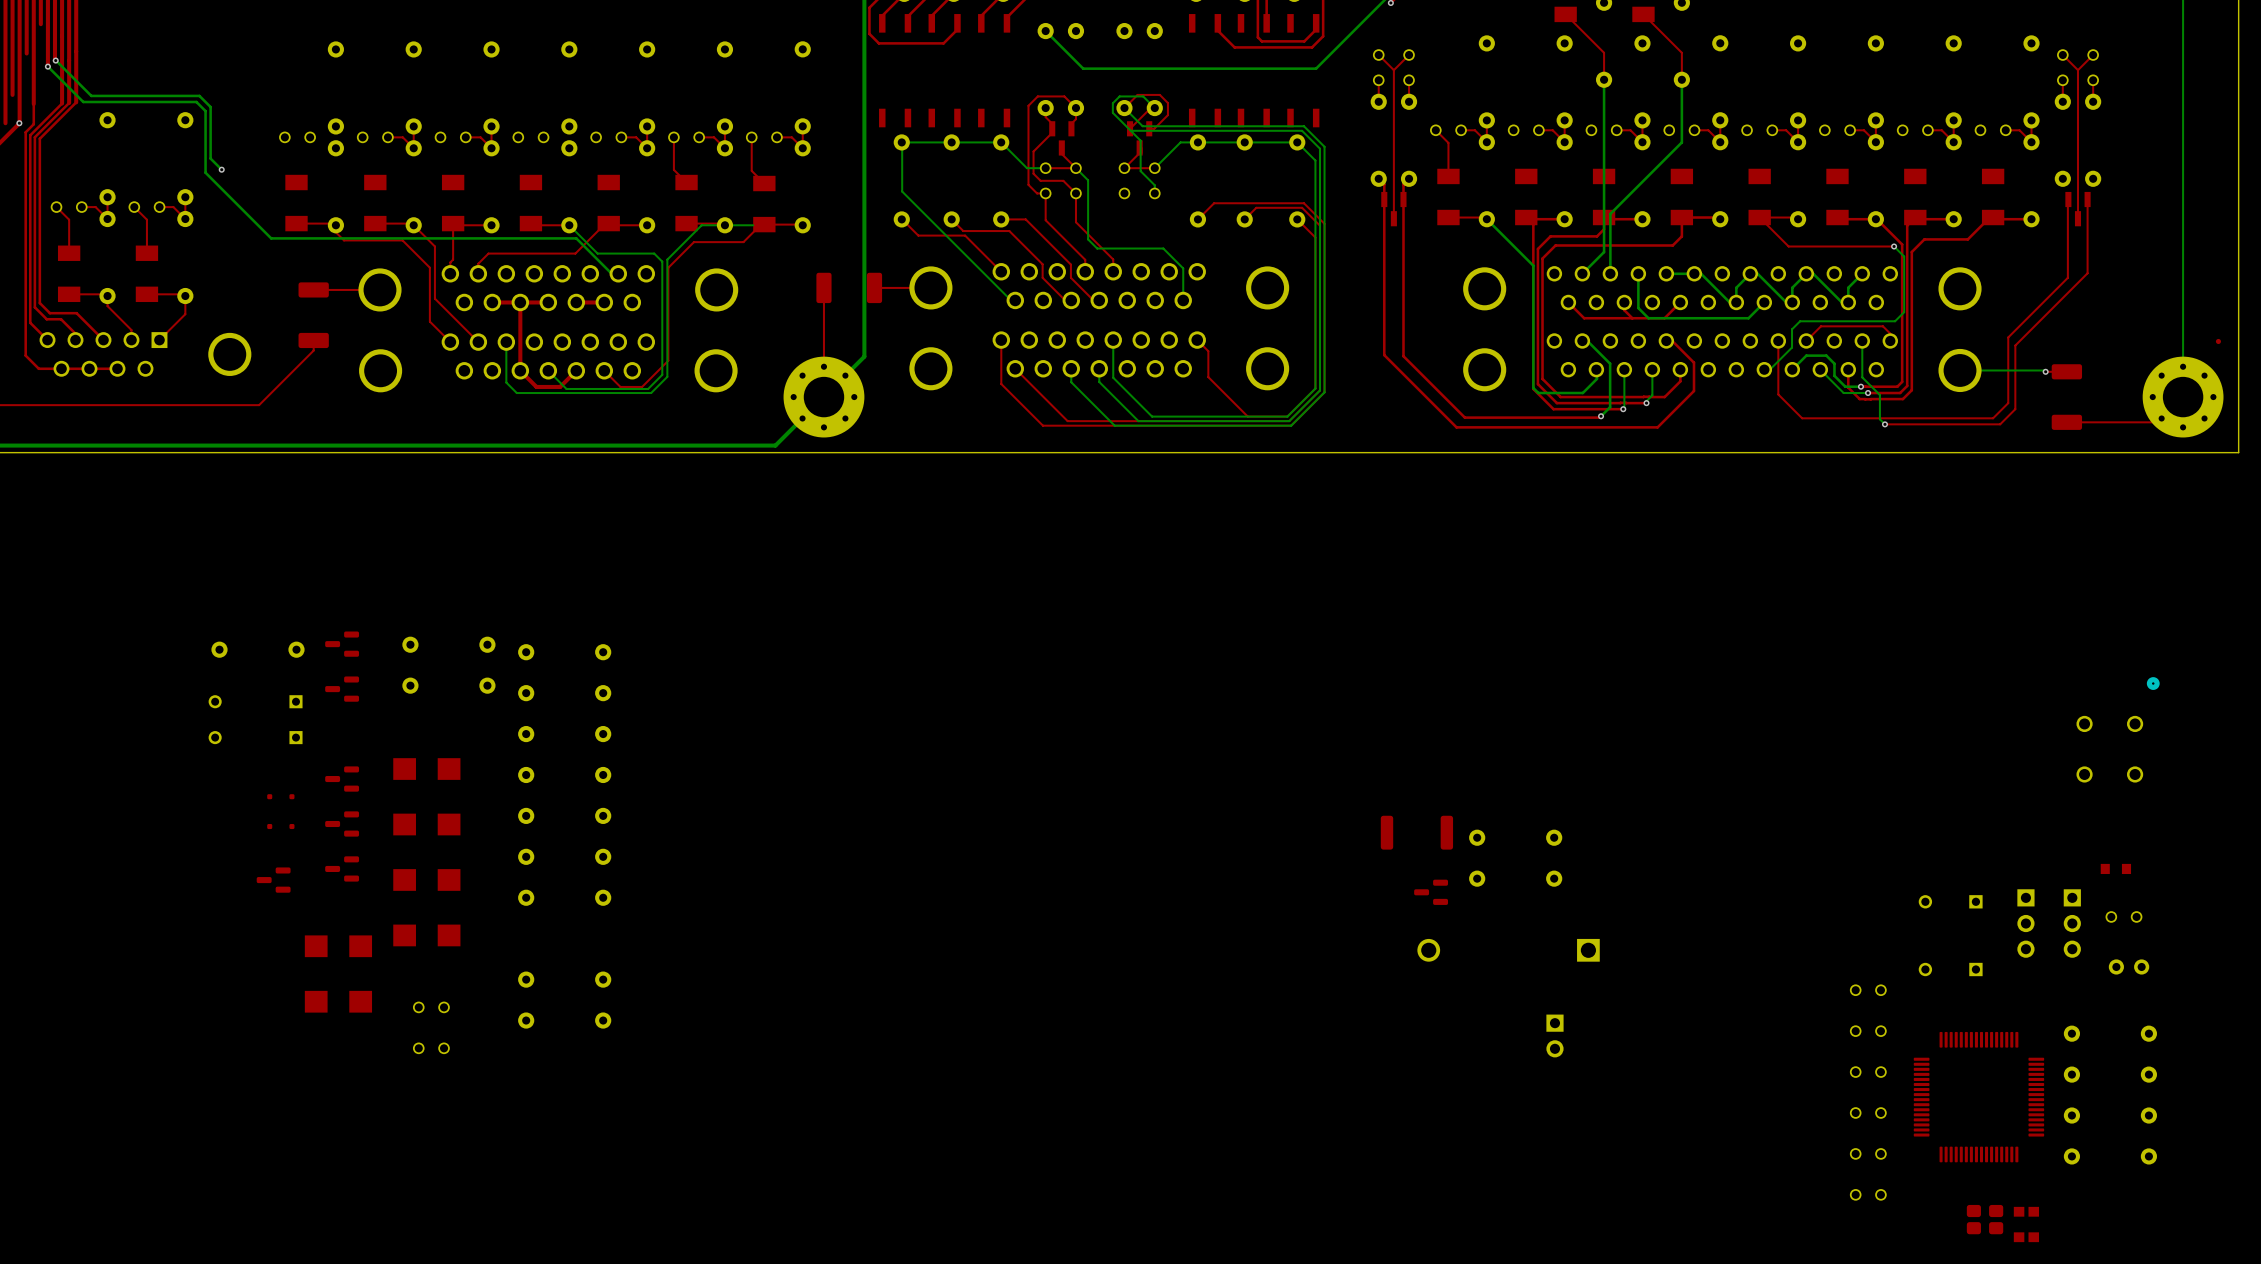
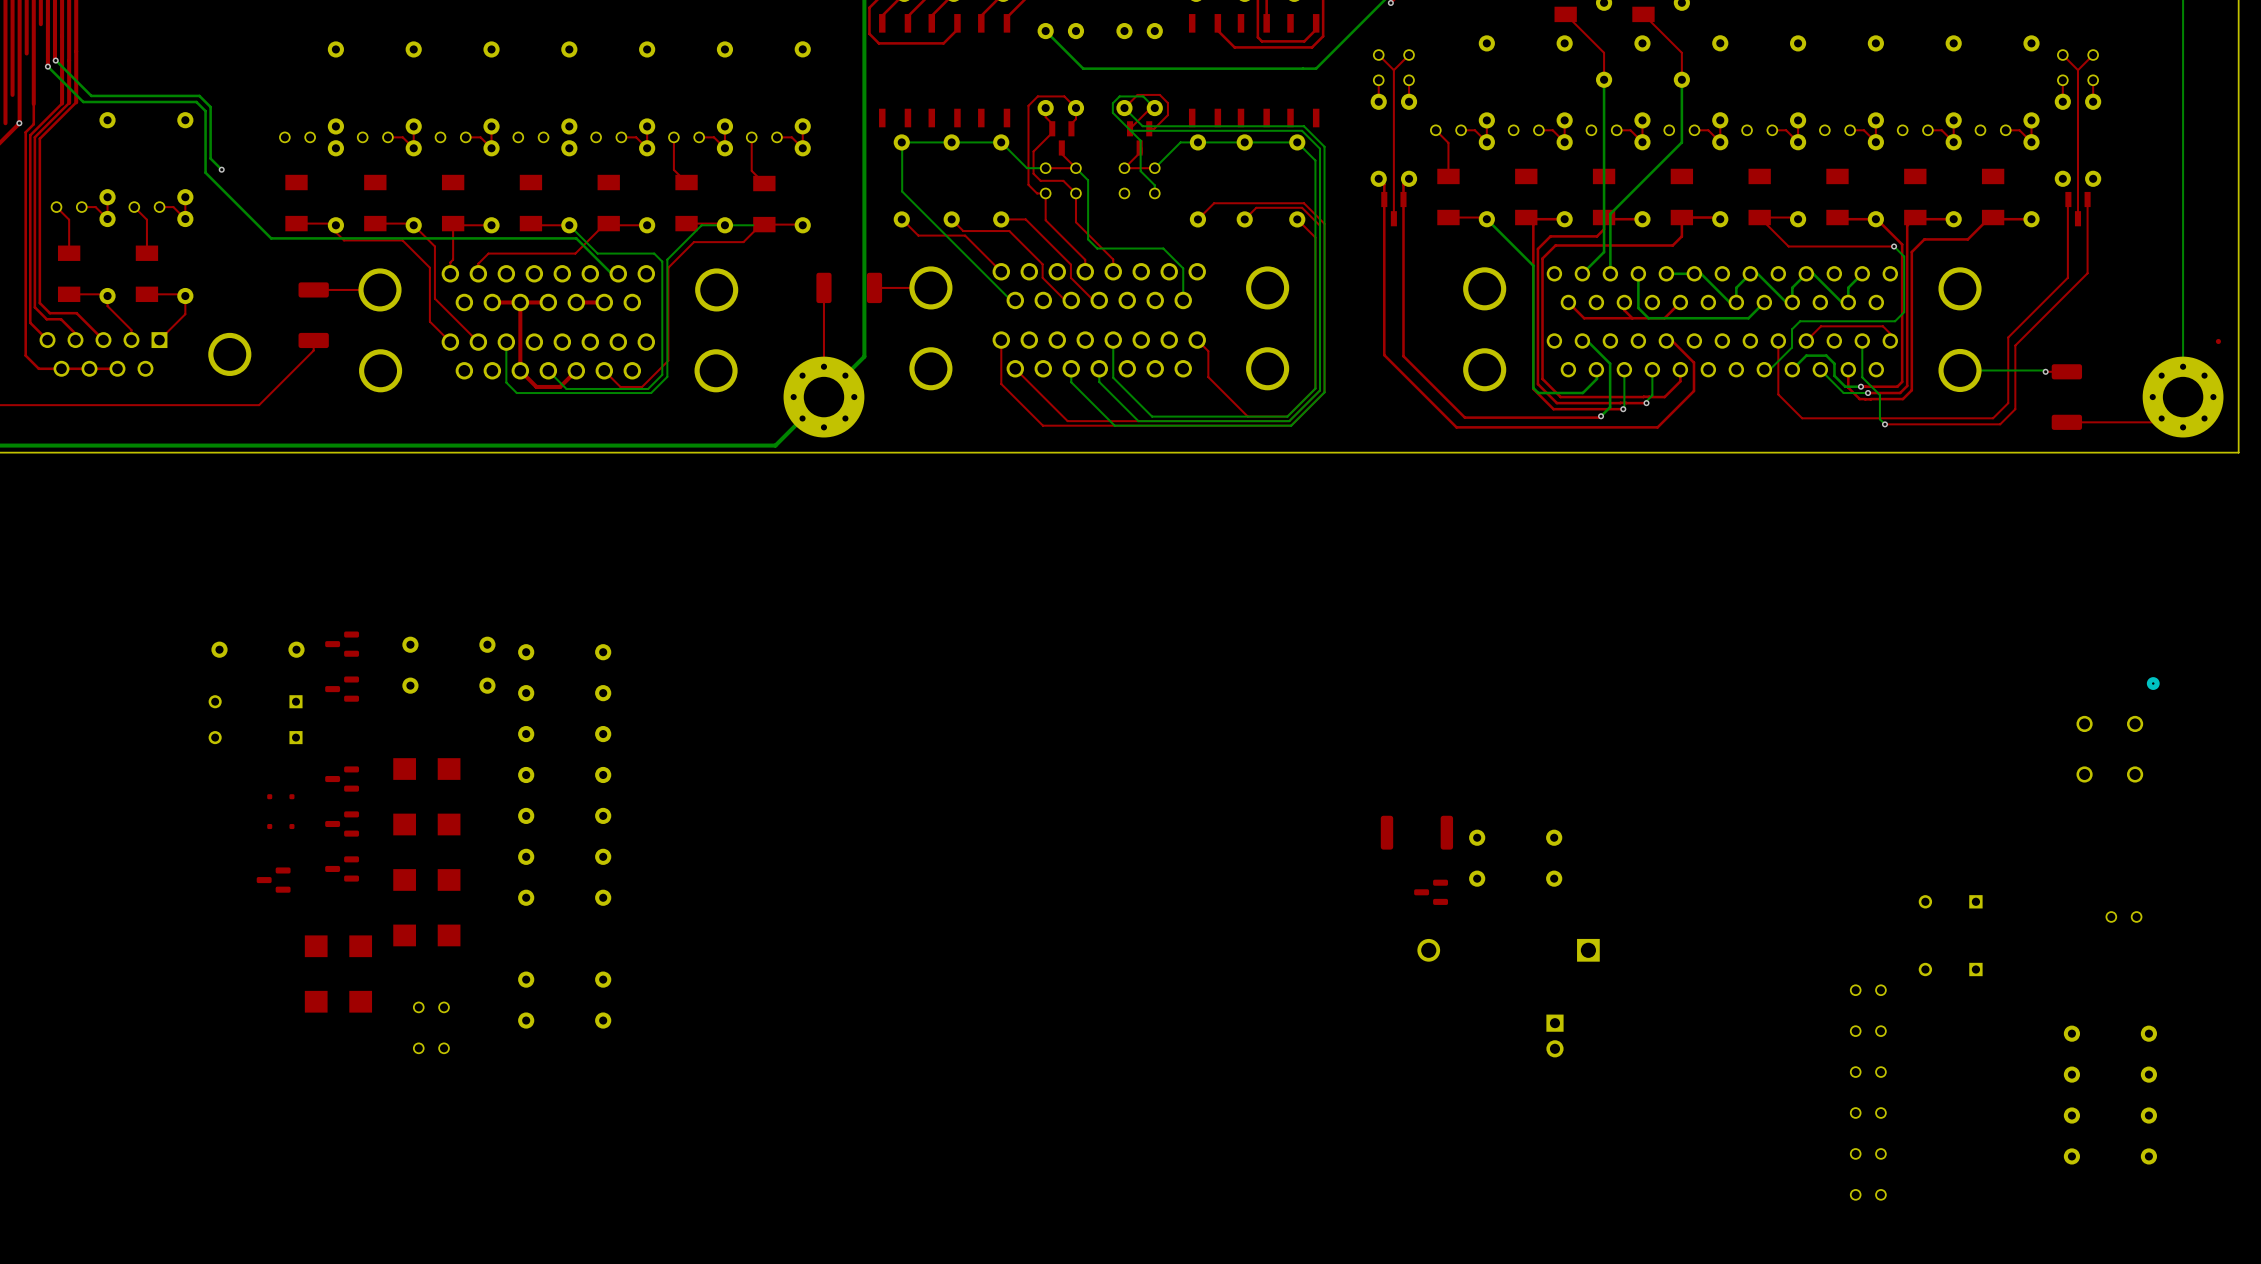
part: (2115, 868) -> none
part: (2025, 923) -> none
part: (2072, 923) -> none
part: (2129, 966) -> none
part: (1978, 1097) -> none
part: (2026, 1211) -> none
part: (1985, 1219) -> none
part: (2026, 1237) -> none

